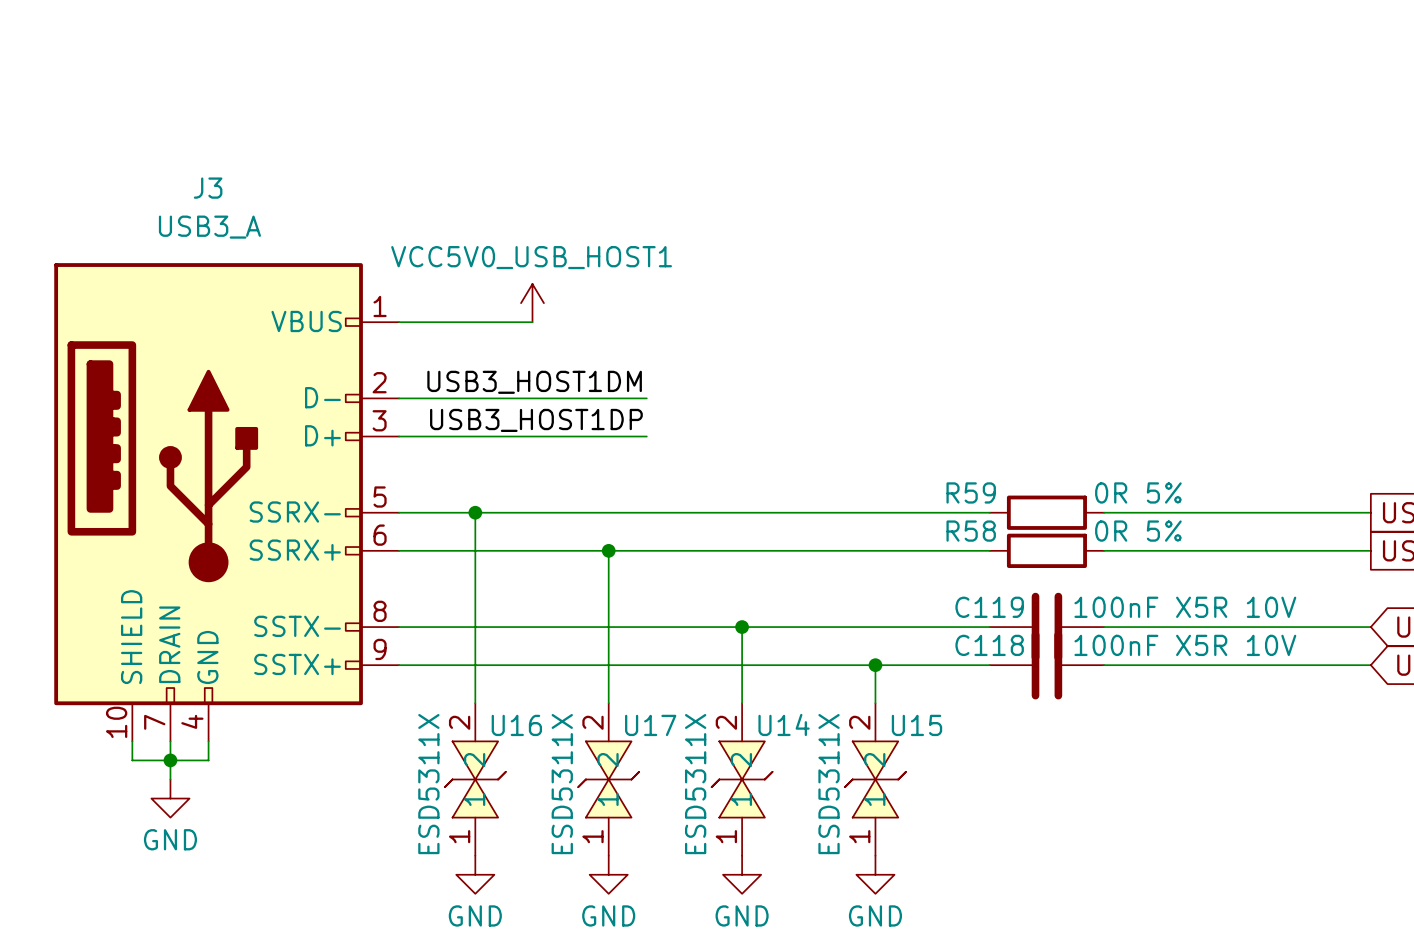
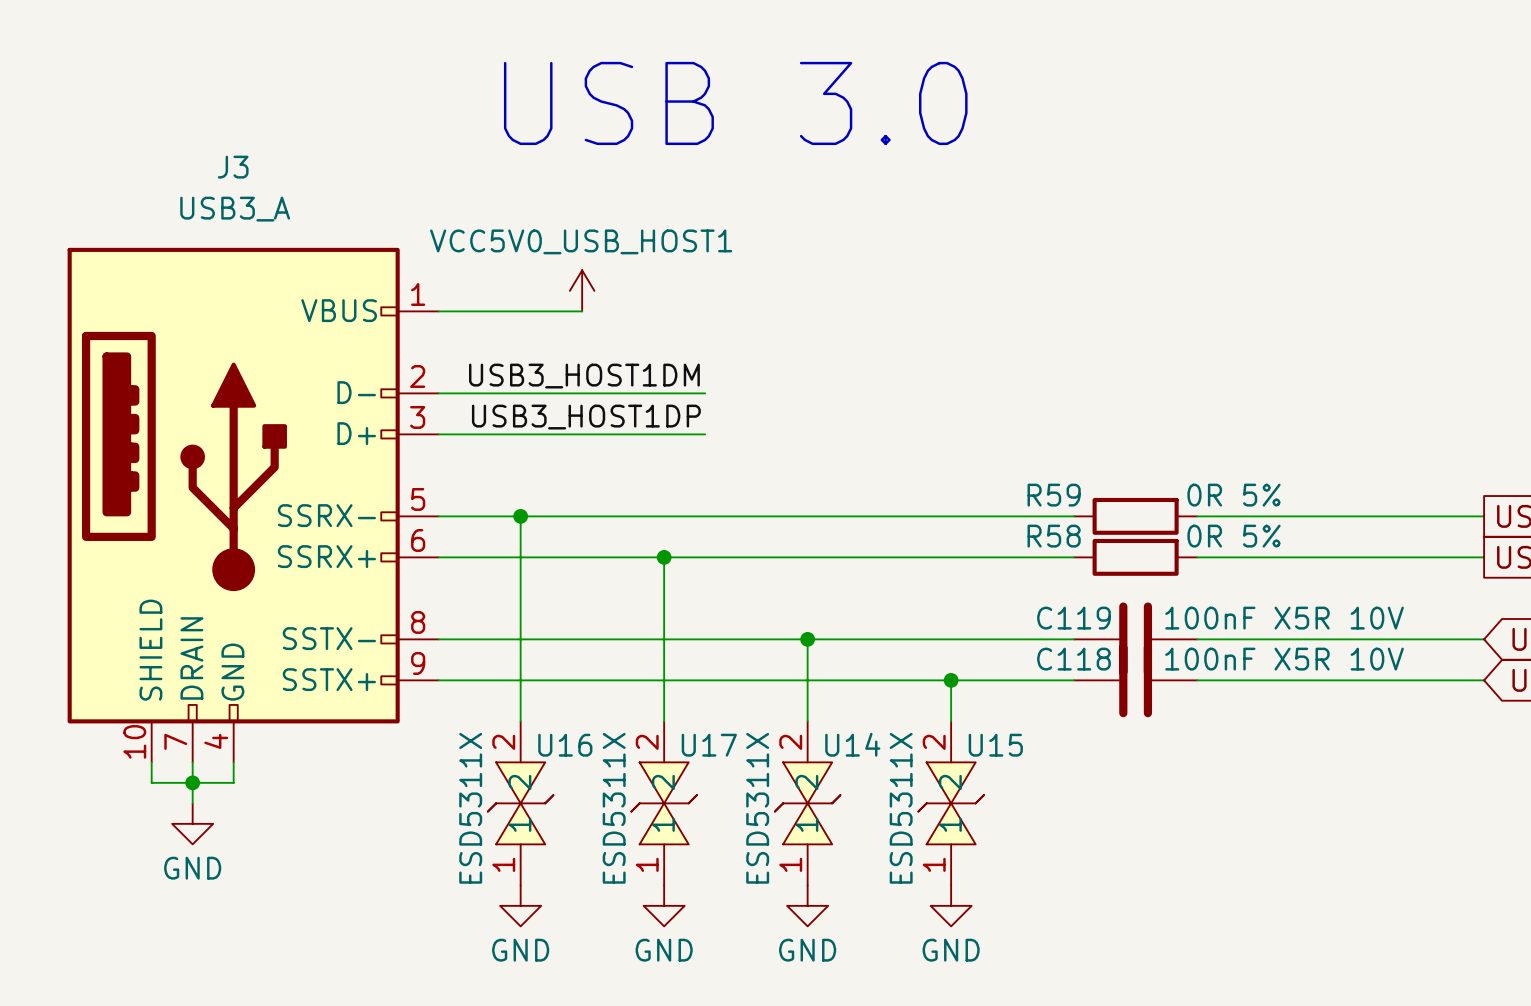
text: none -> USB 3.0 (735, 103)

